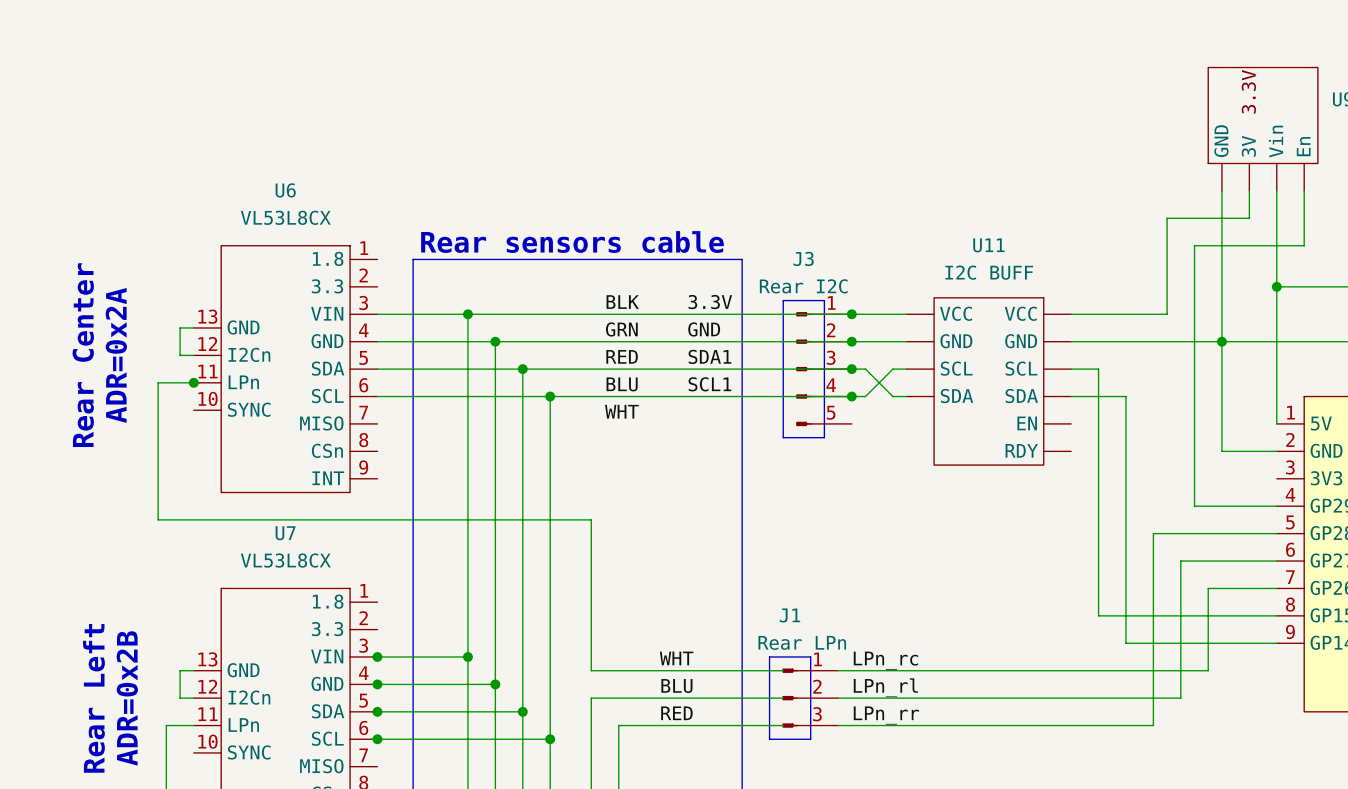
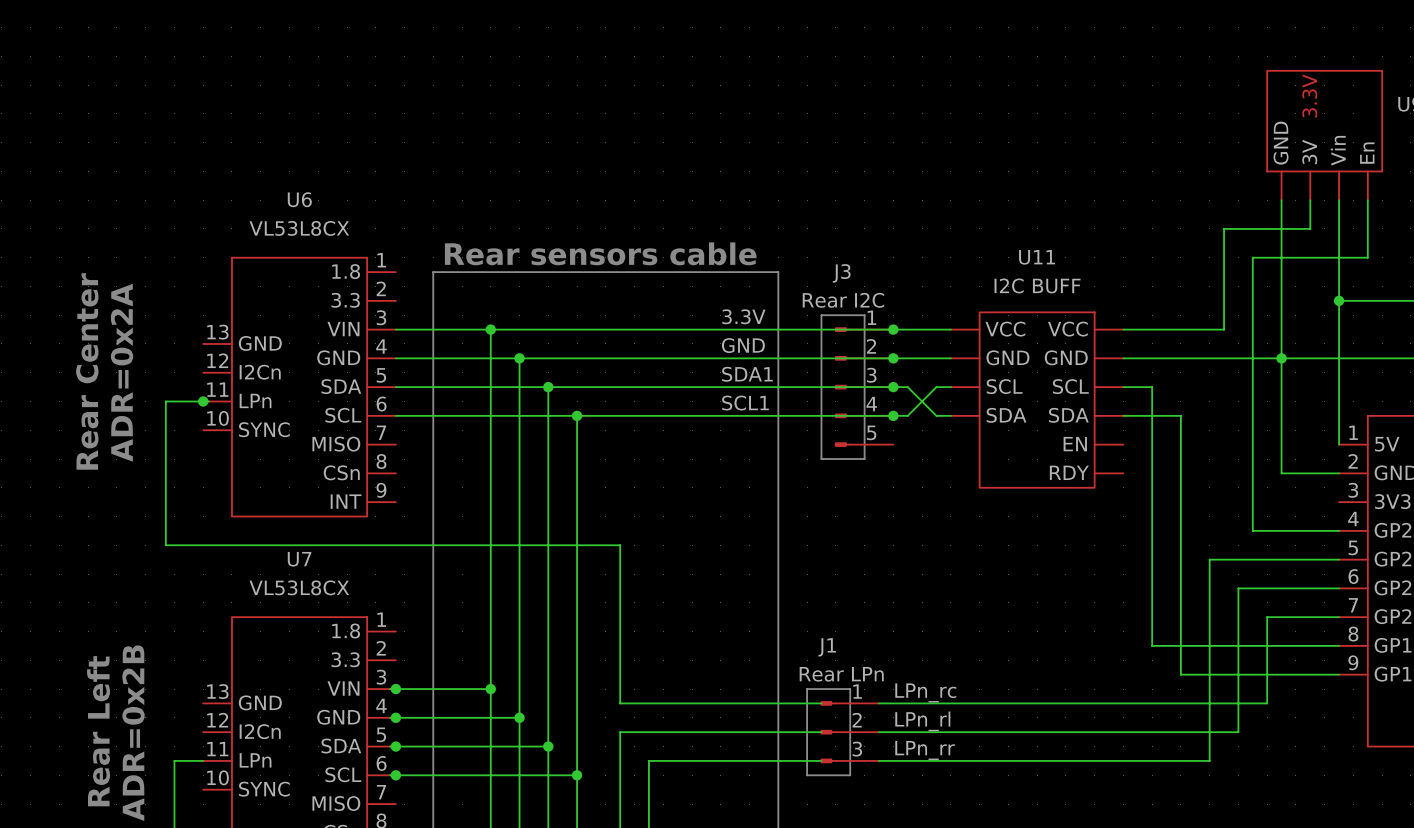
label: BLK (622, 302) -> none
wire: (193, 327) (180, 327) (180, 355) (193, 355) -> none
label: GRN (621, 329) -> none
label: RED (622, 356) -> none
label: BLU (622, 384) -> none
label: WHT (621, 411) -> none
label: WHT (676, 658) -> none
wire: (193, 670) (180, 670) (180, 698) (193, 698) -> none
label: BLU (676, 686) -> none
label: RED (676, 713) -> none

